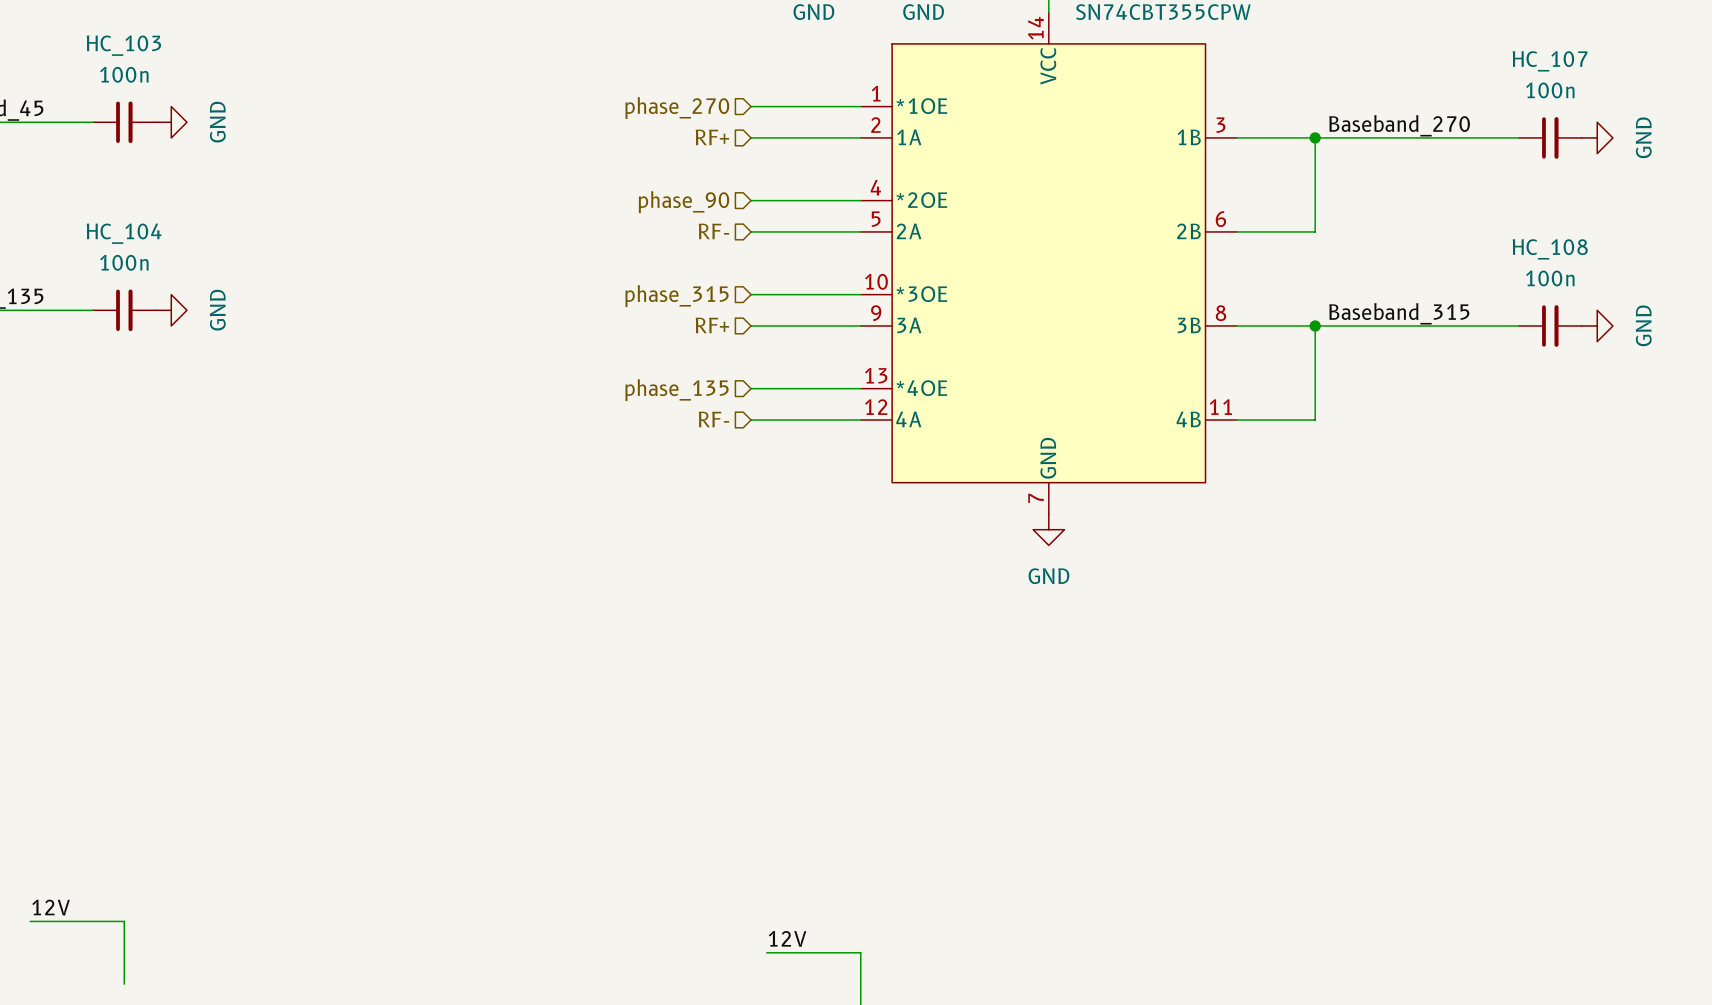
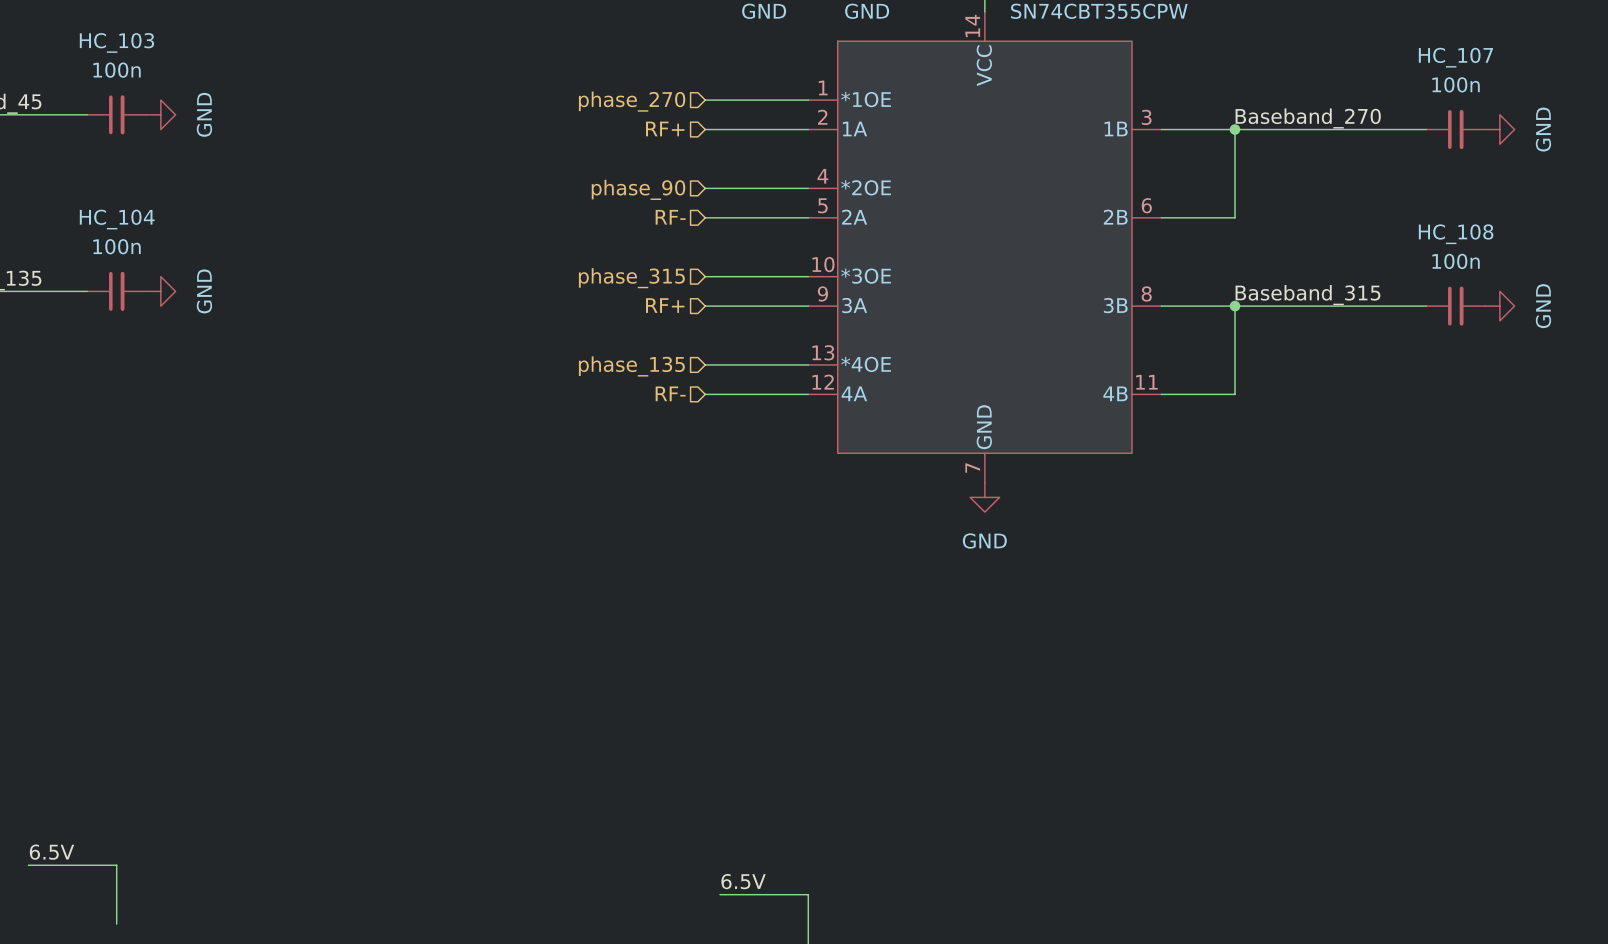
label: 12V (51, 907) -> 6.5V (51, 852)
label: 12V (787, 938) -> 6.5V (743, 881)

